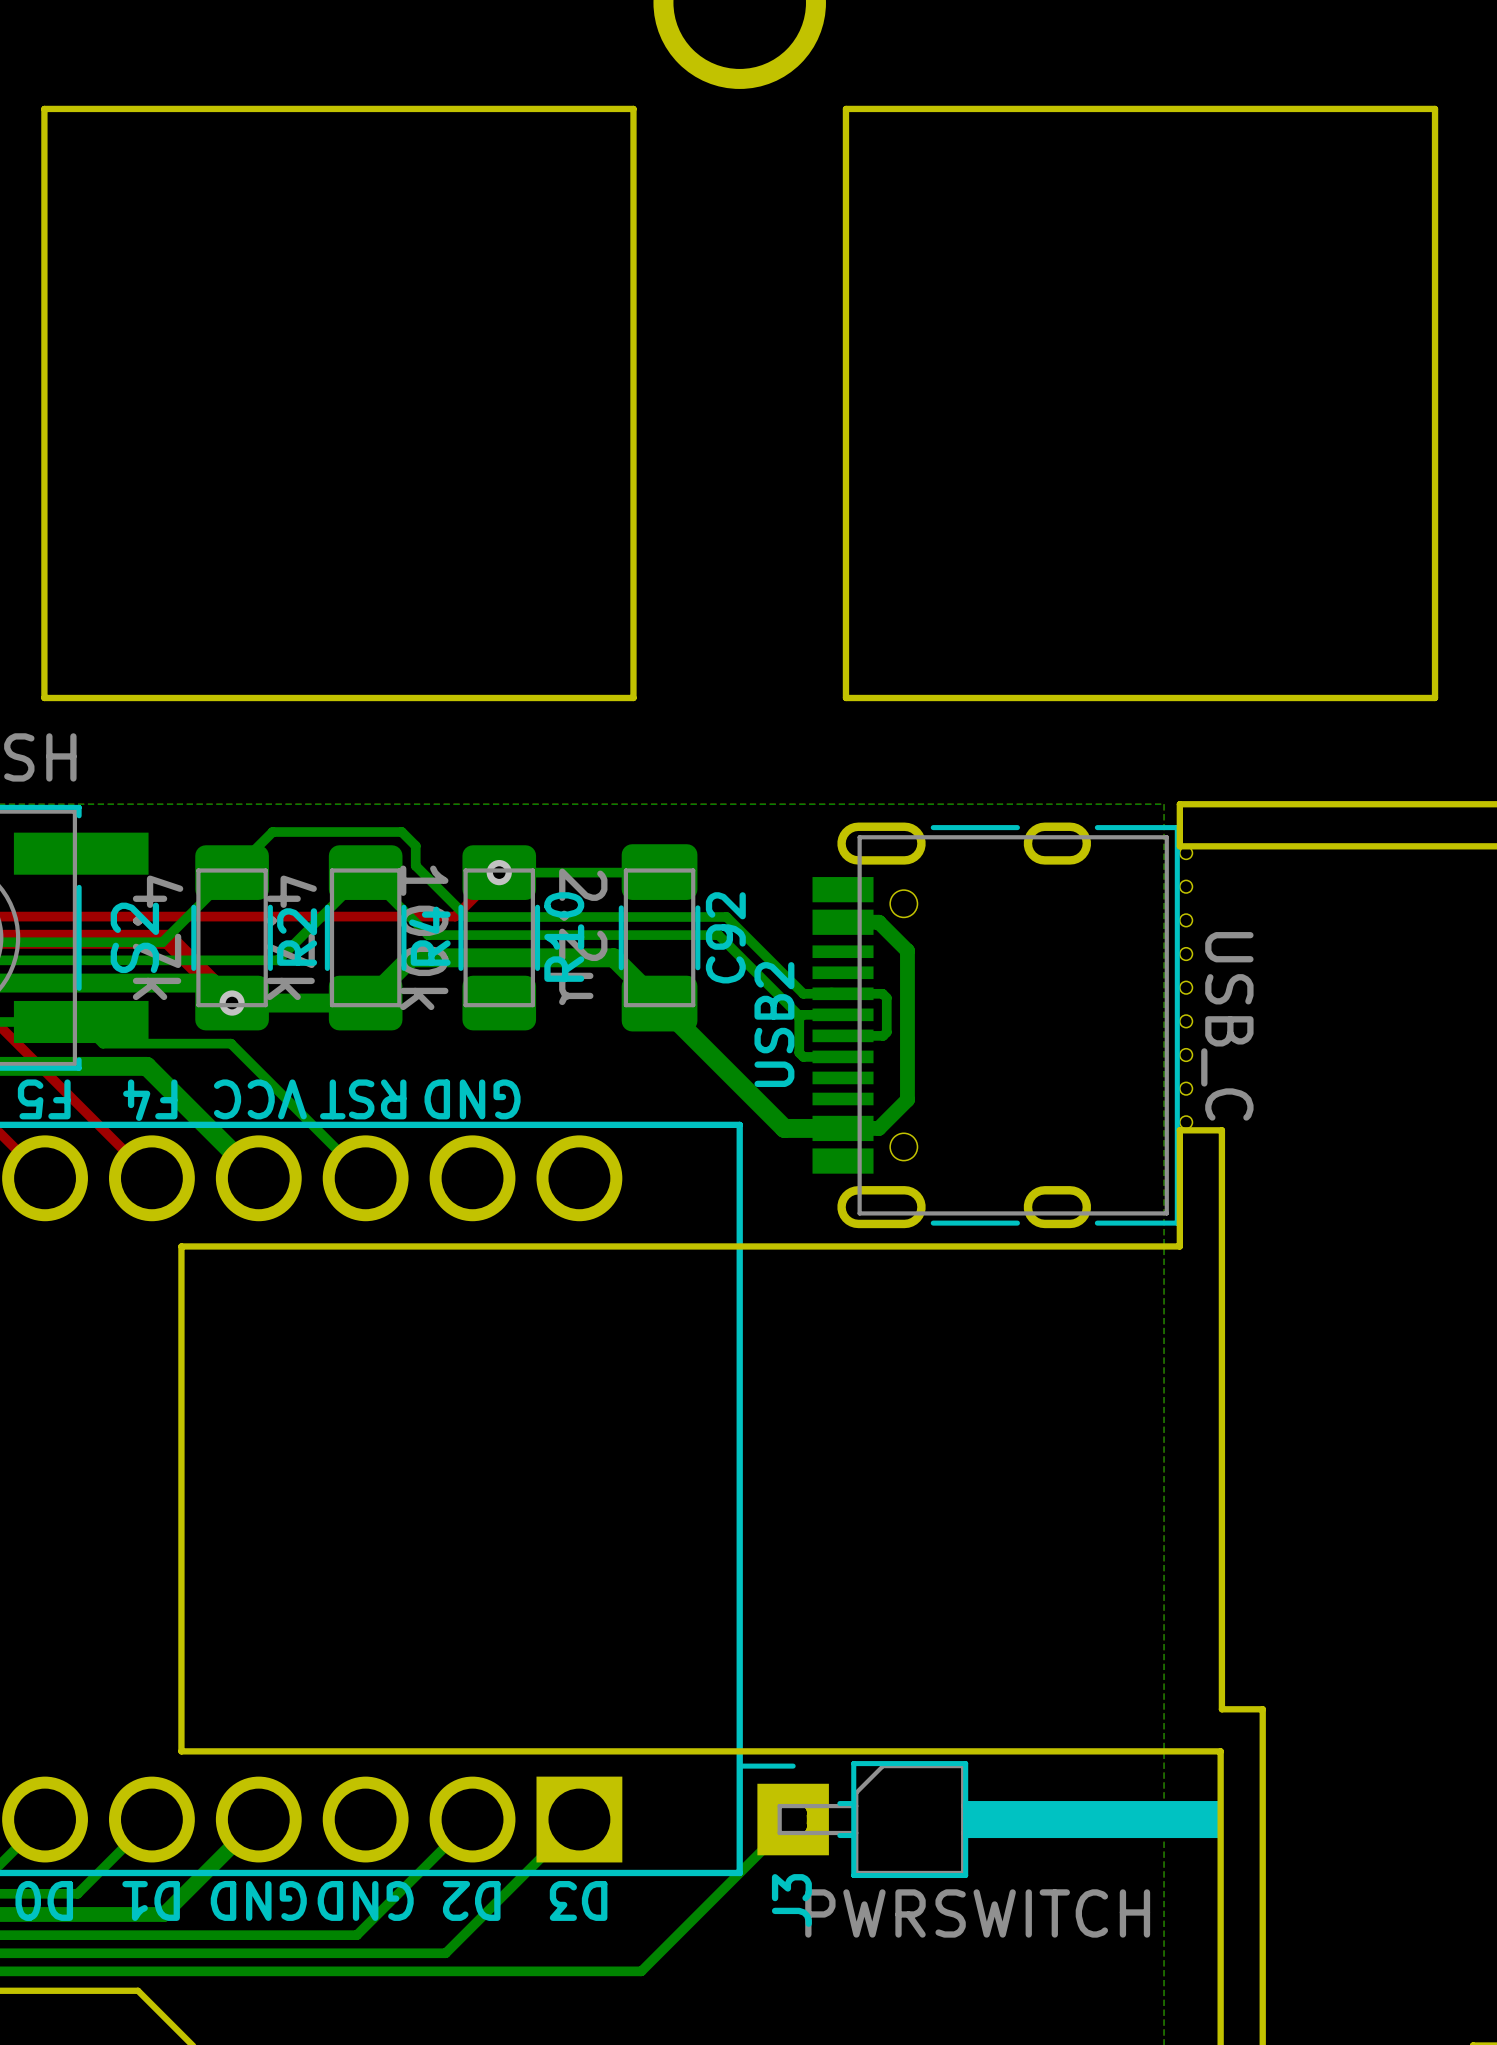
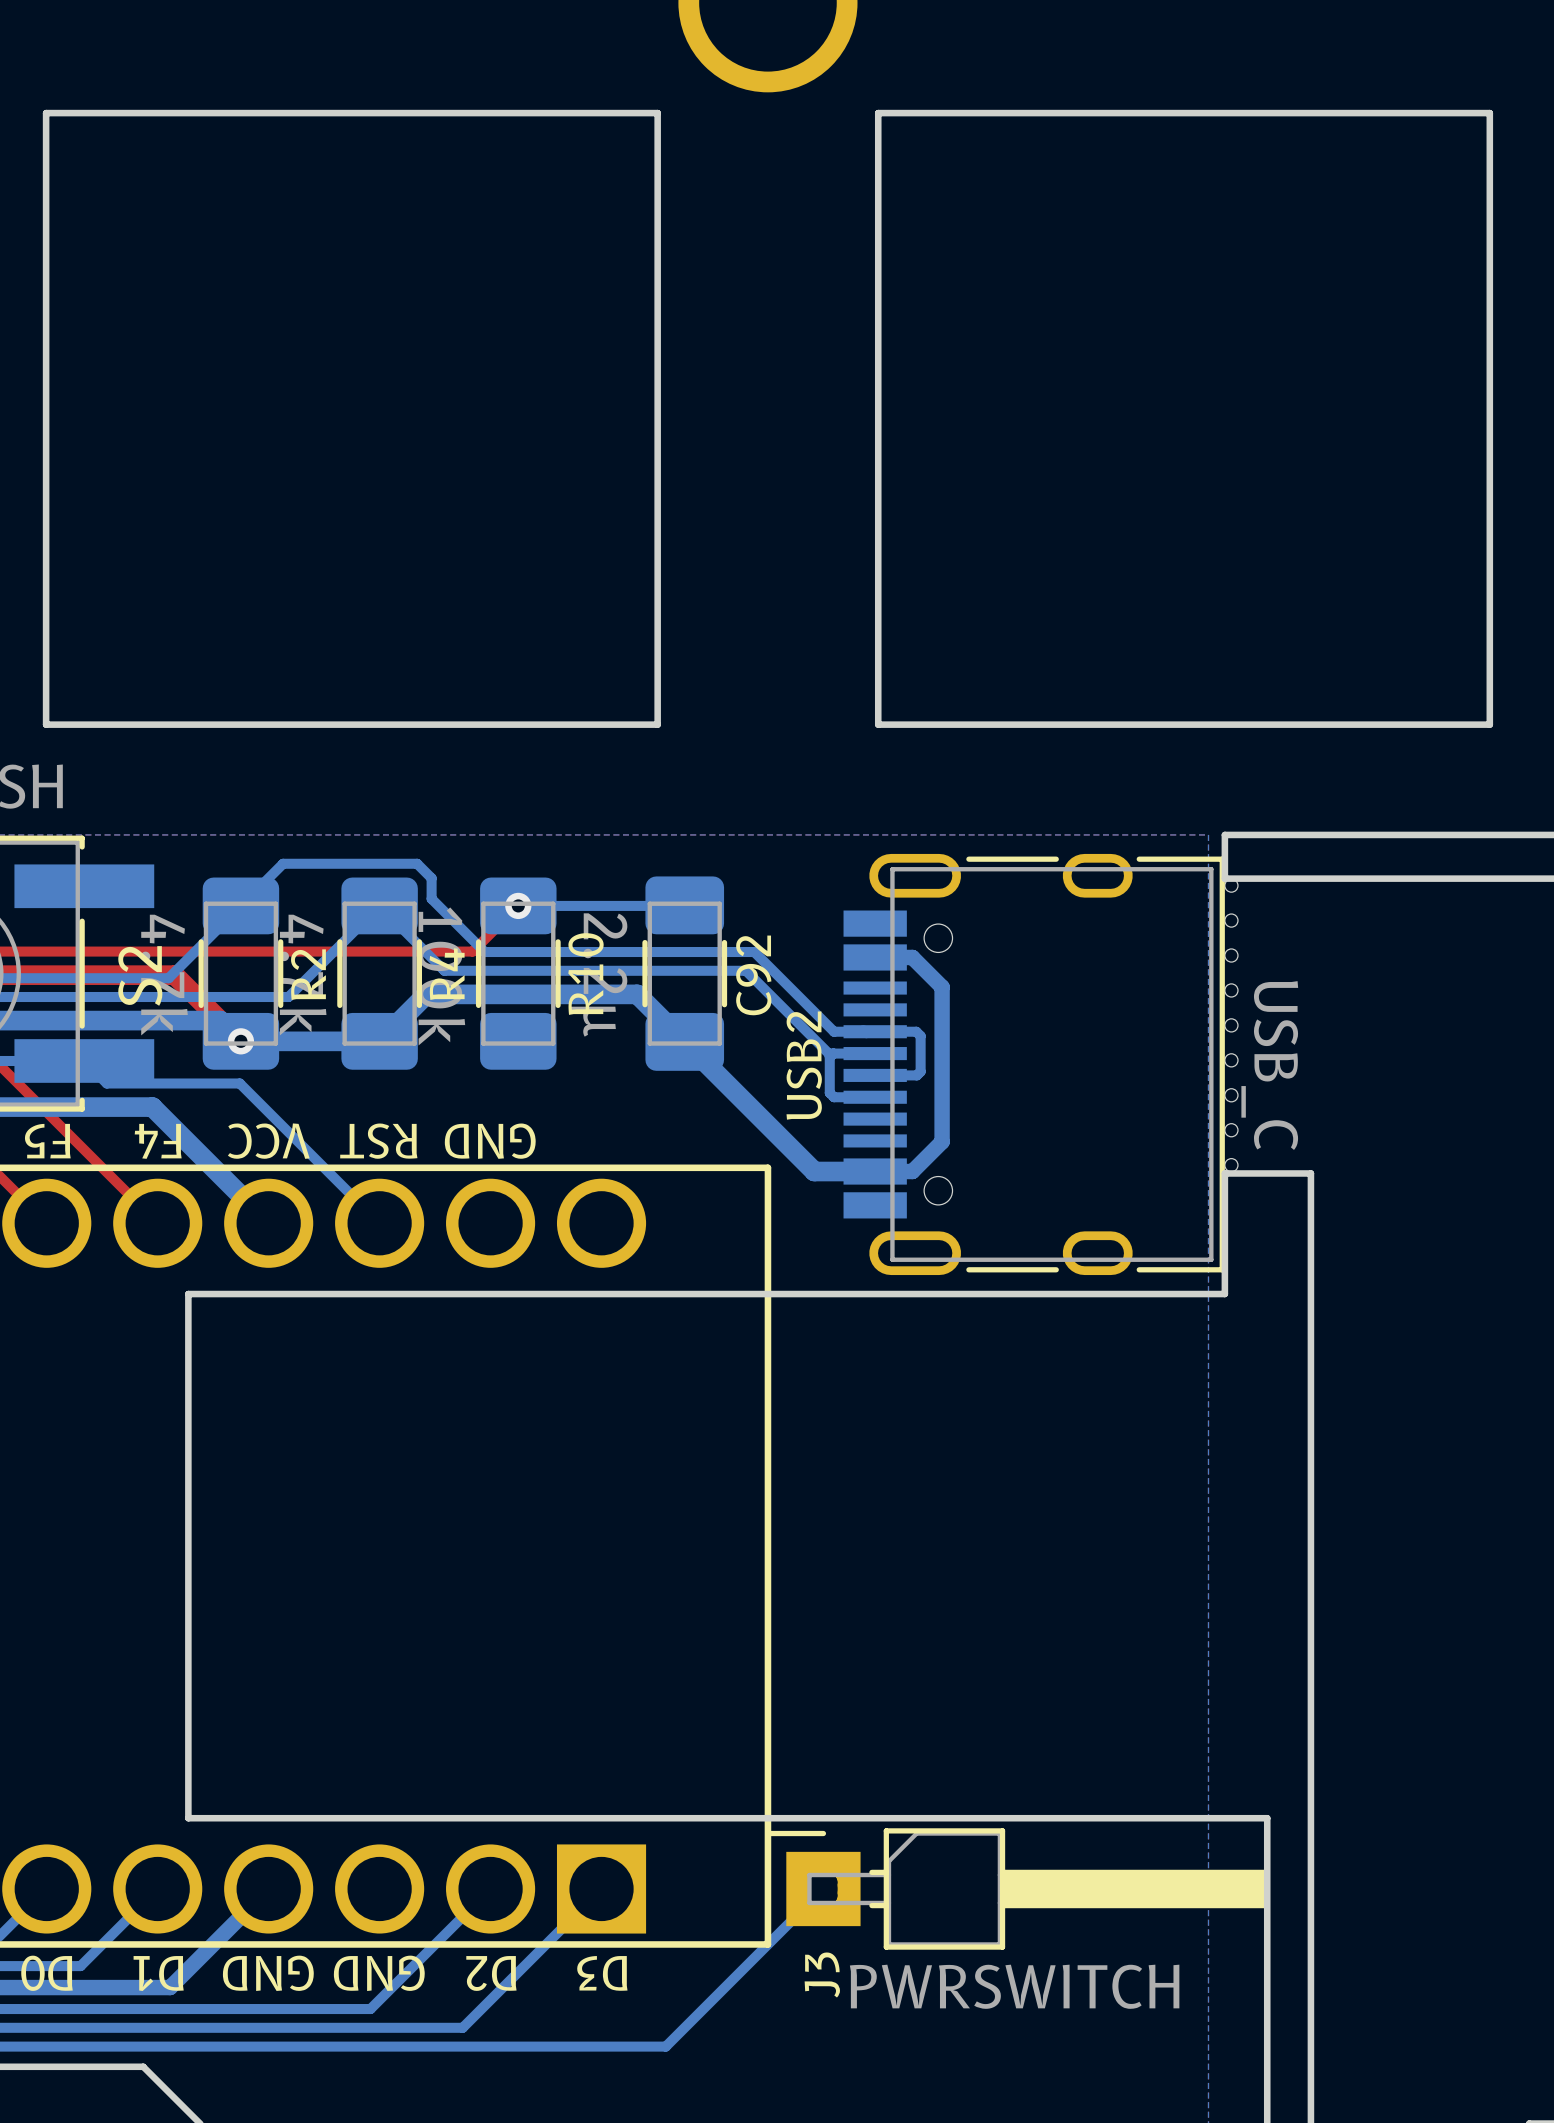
board edge: (1221, 1130) (1221, 1709) (1262, 1709) -> (1268, 1173) (1310, 1173) (1310, 1774)

